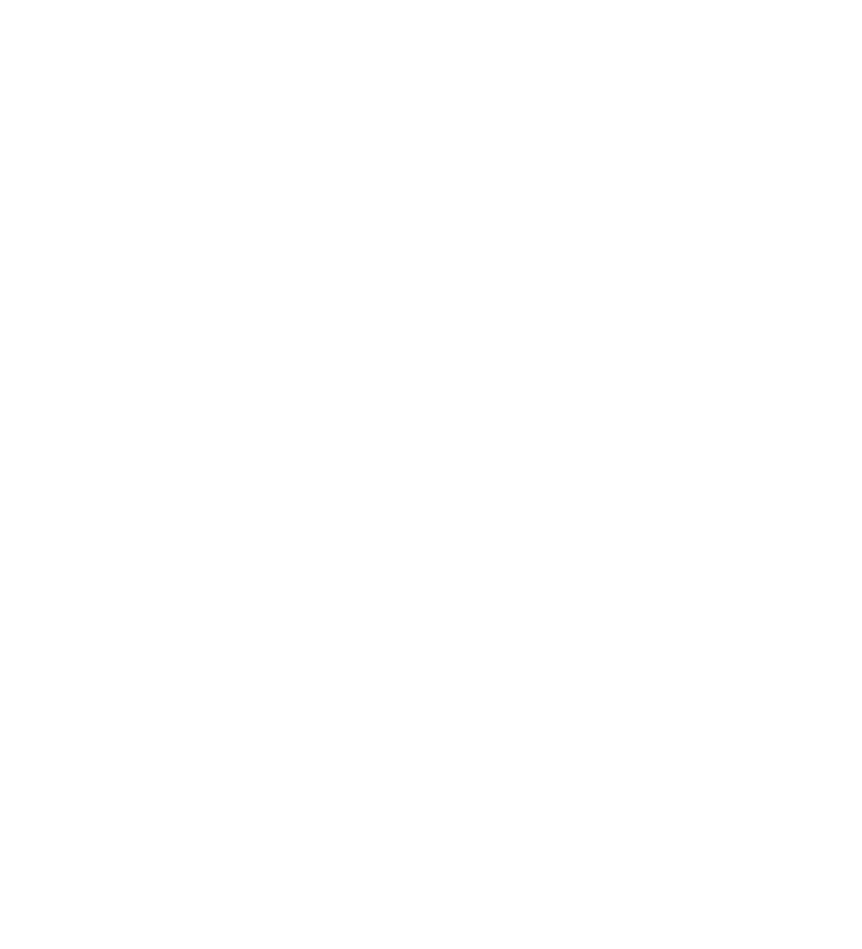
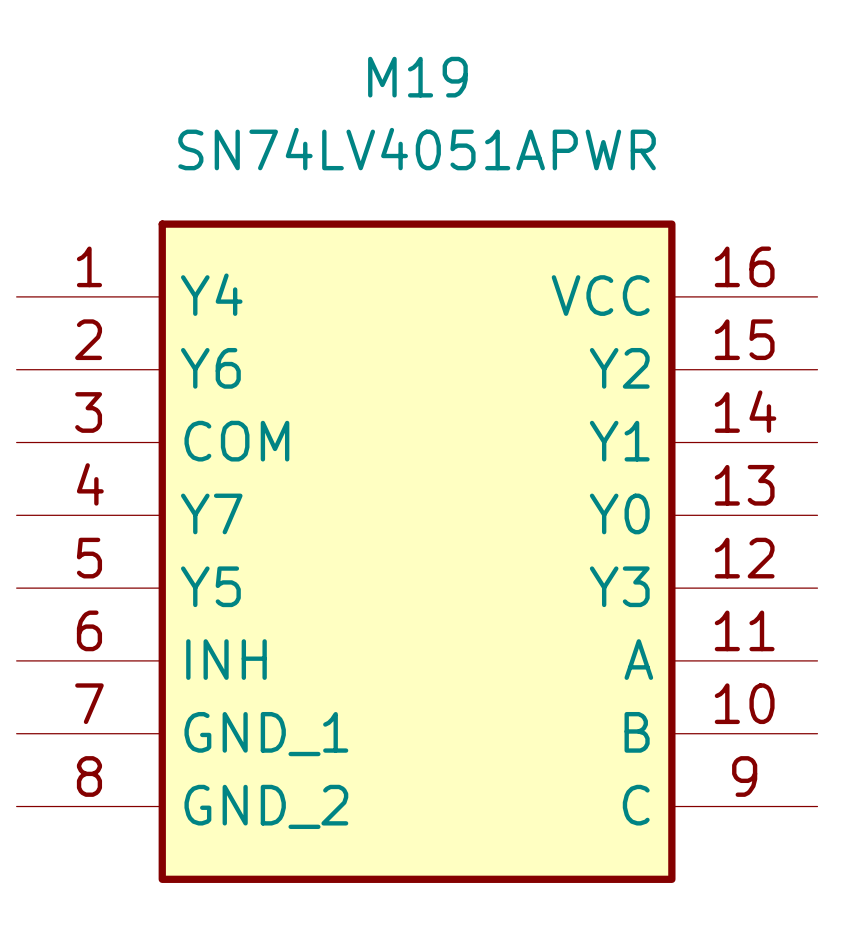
M19: none -> SN74LV4051APWR (417, 551)

